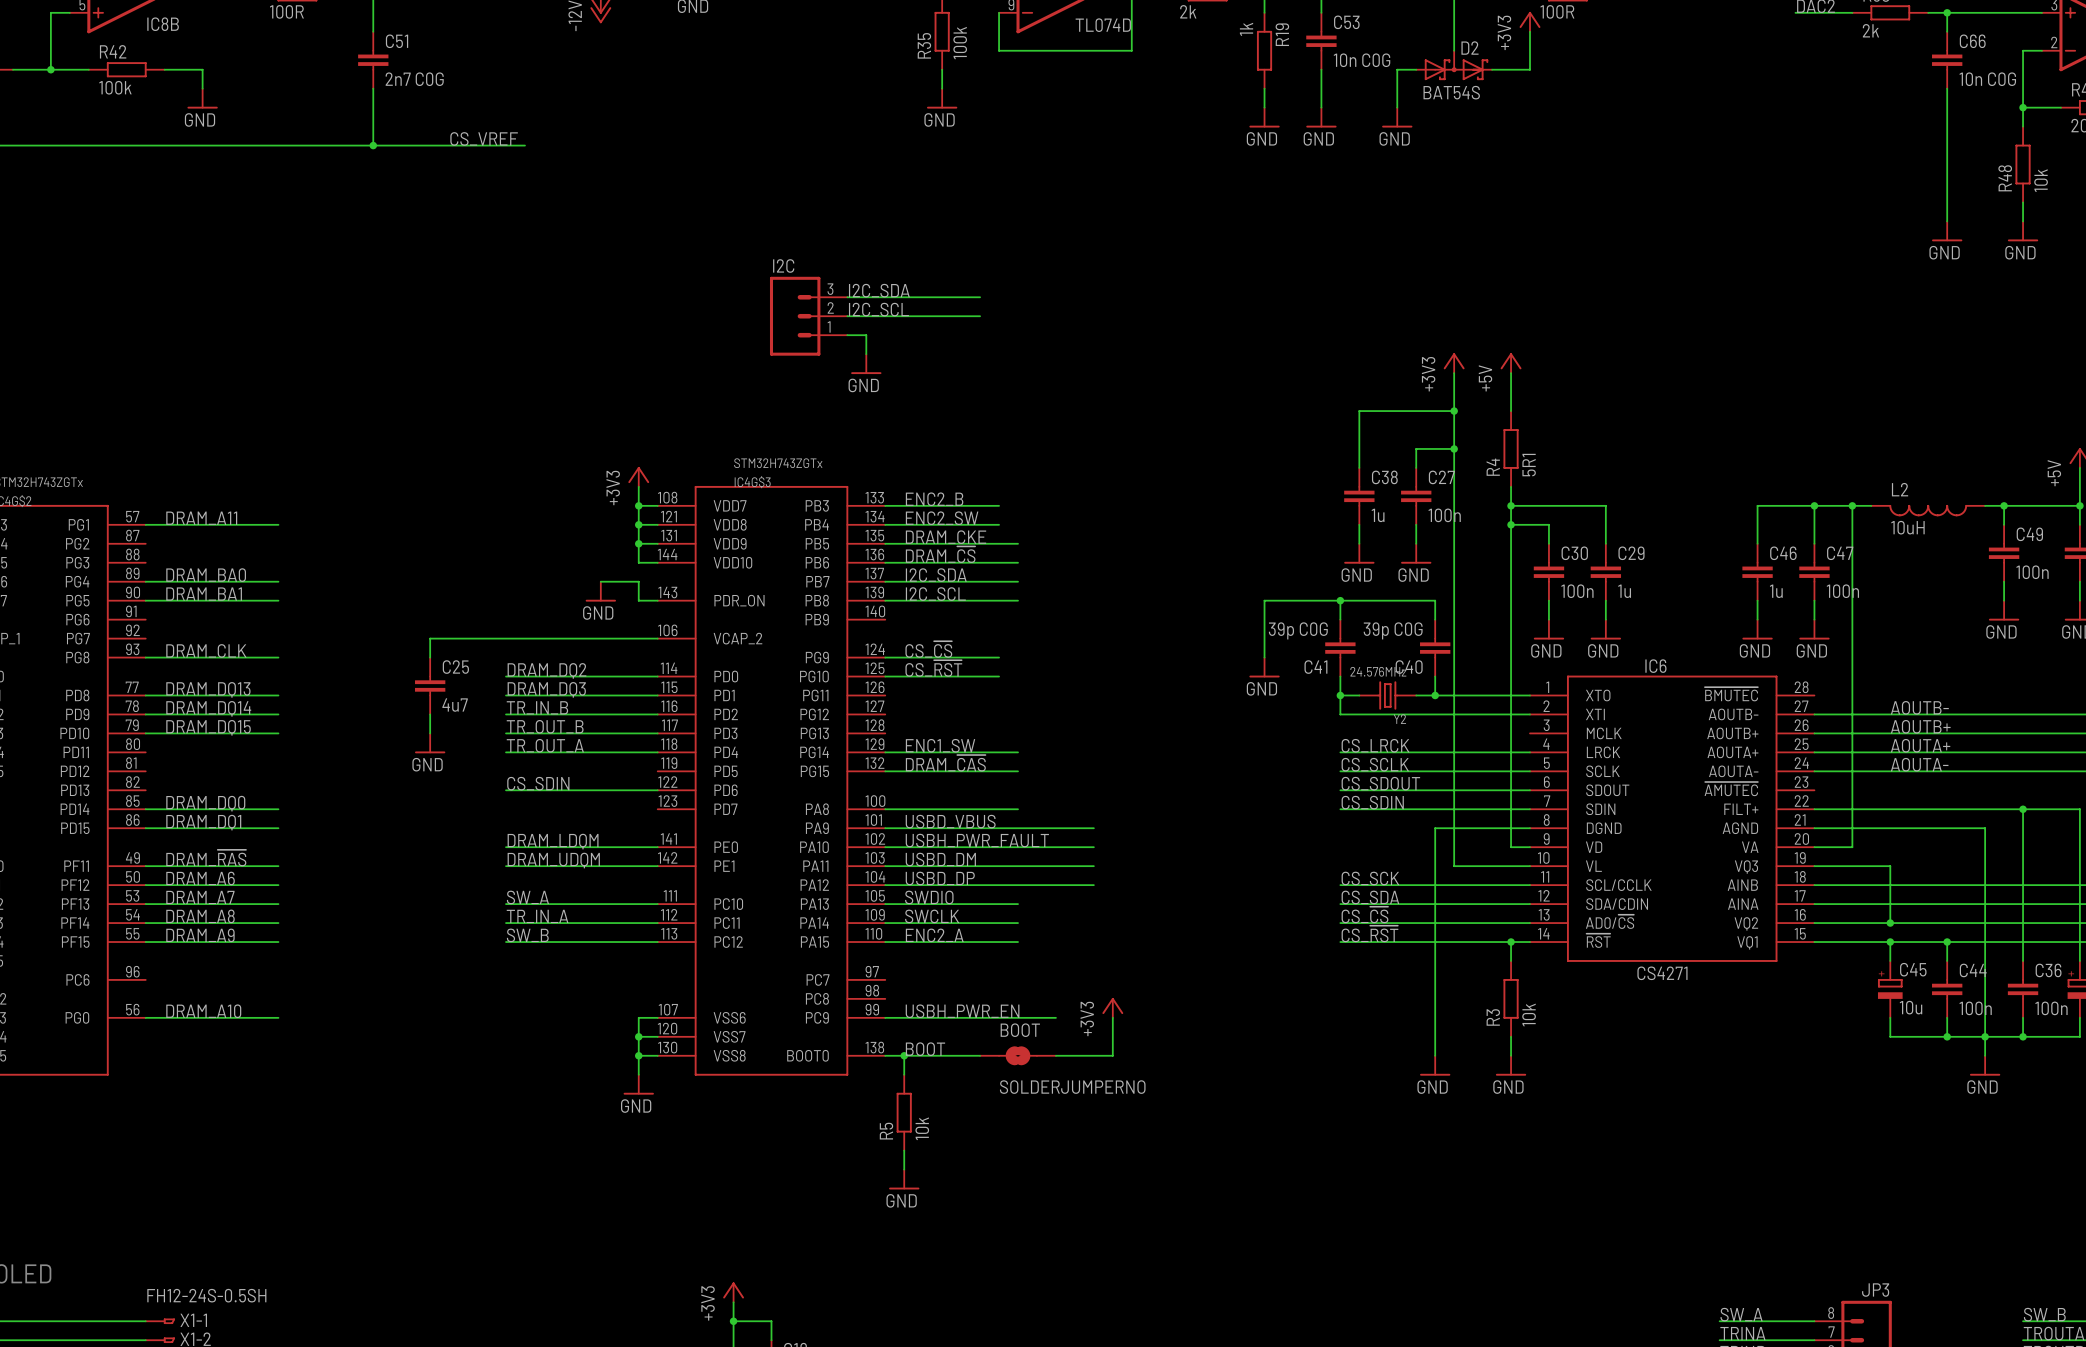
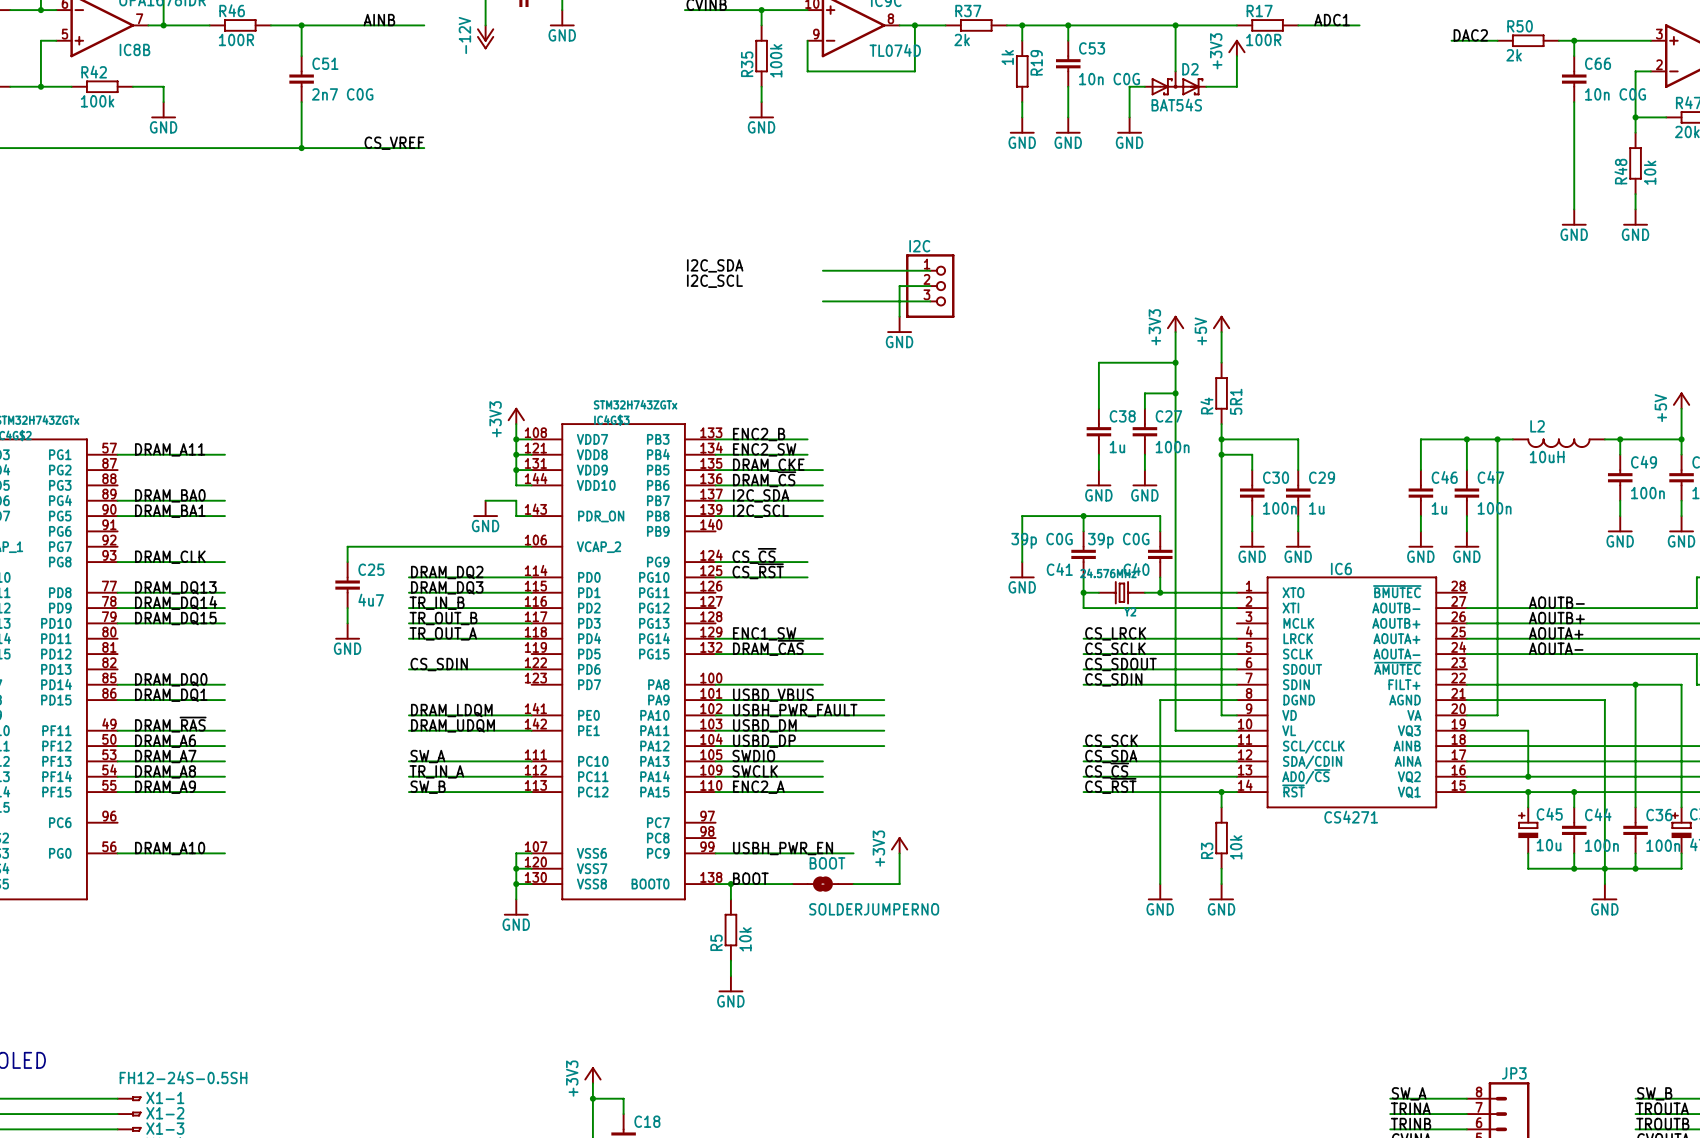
I2C symbol: [769, 276, 848, 356] -> [906, 254, 955, 318]
wire: (847, 297) (980, 297) -> (822, 270) (930, 270)
wire: (847, 316) (980, 316) -> (822, 301) (930, 301)
wire: none -> (930, 286) (899, 286) (899, 316)
wire: (847, 335) (866, 335) (866, 354) -> none
power symbol: GND (866, 364) -> none
power symbol: none -> GND (899, 324)

